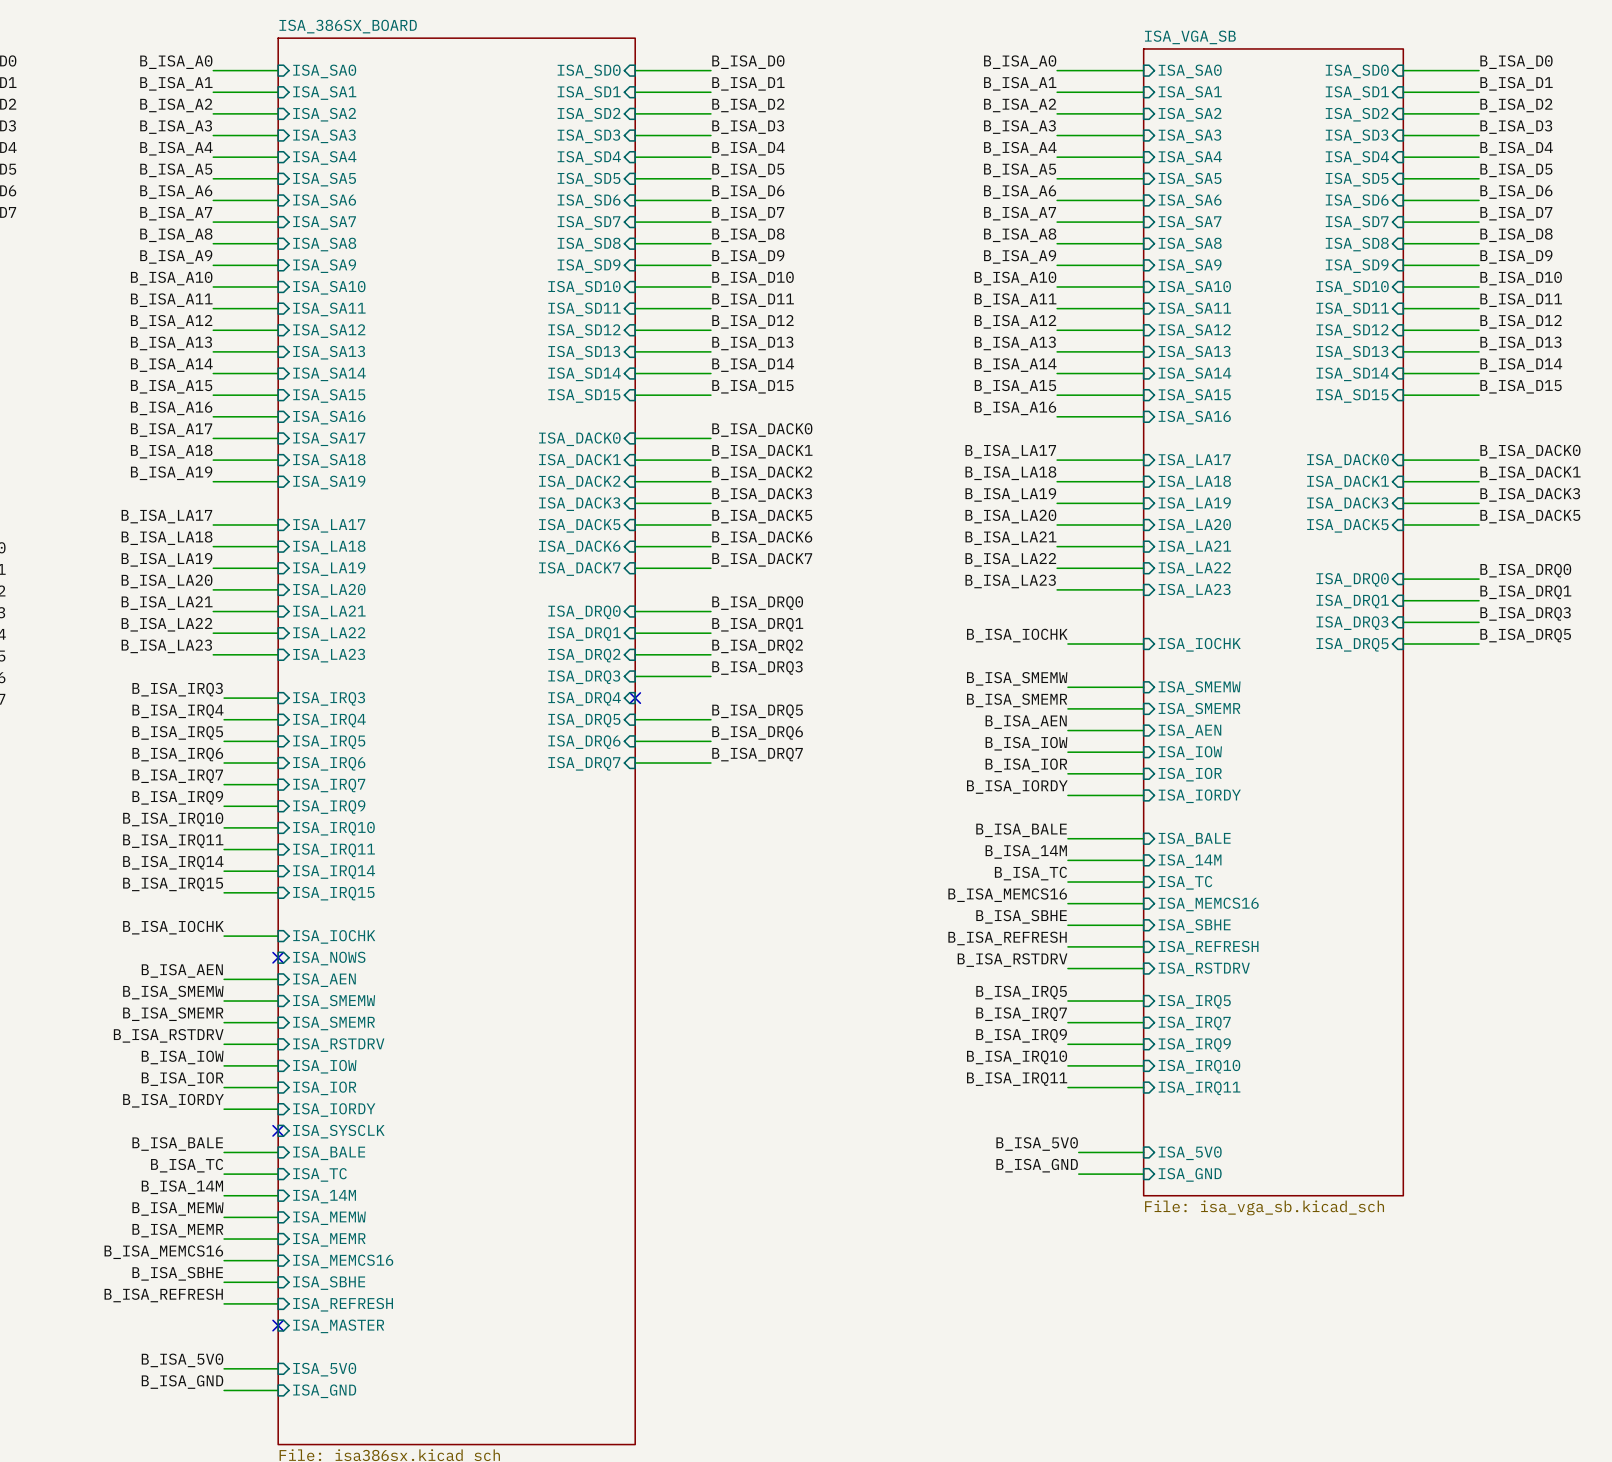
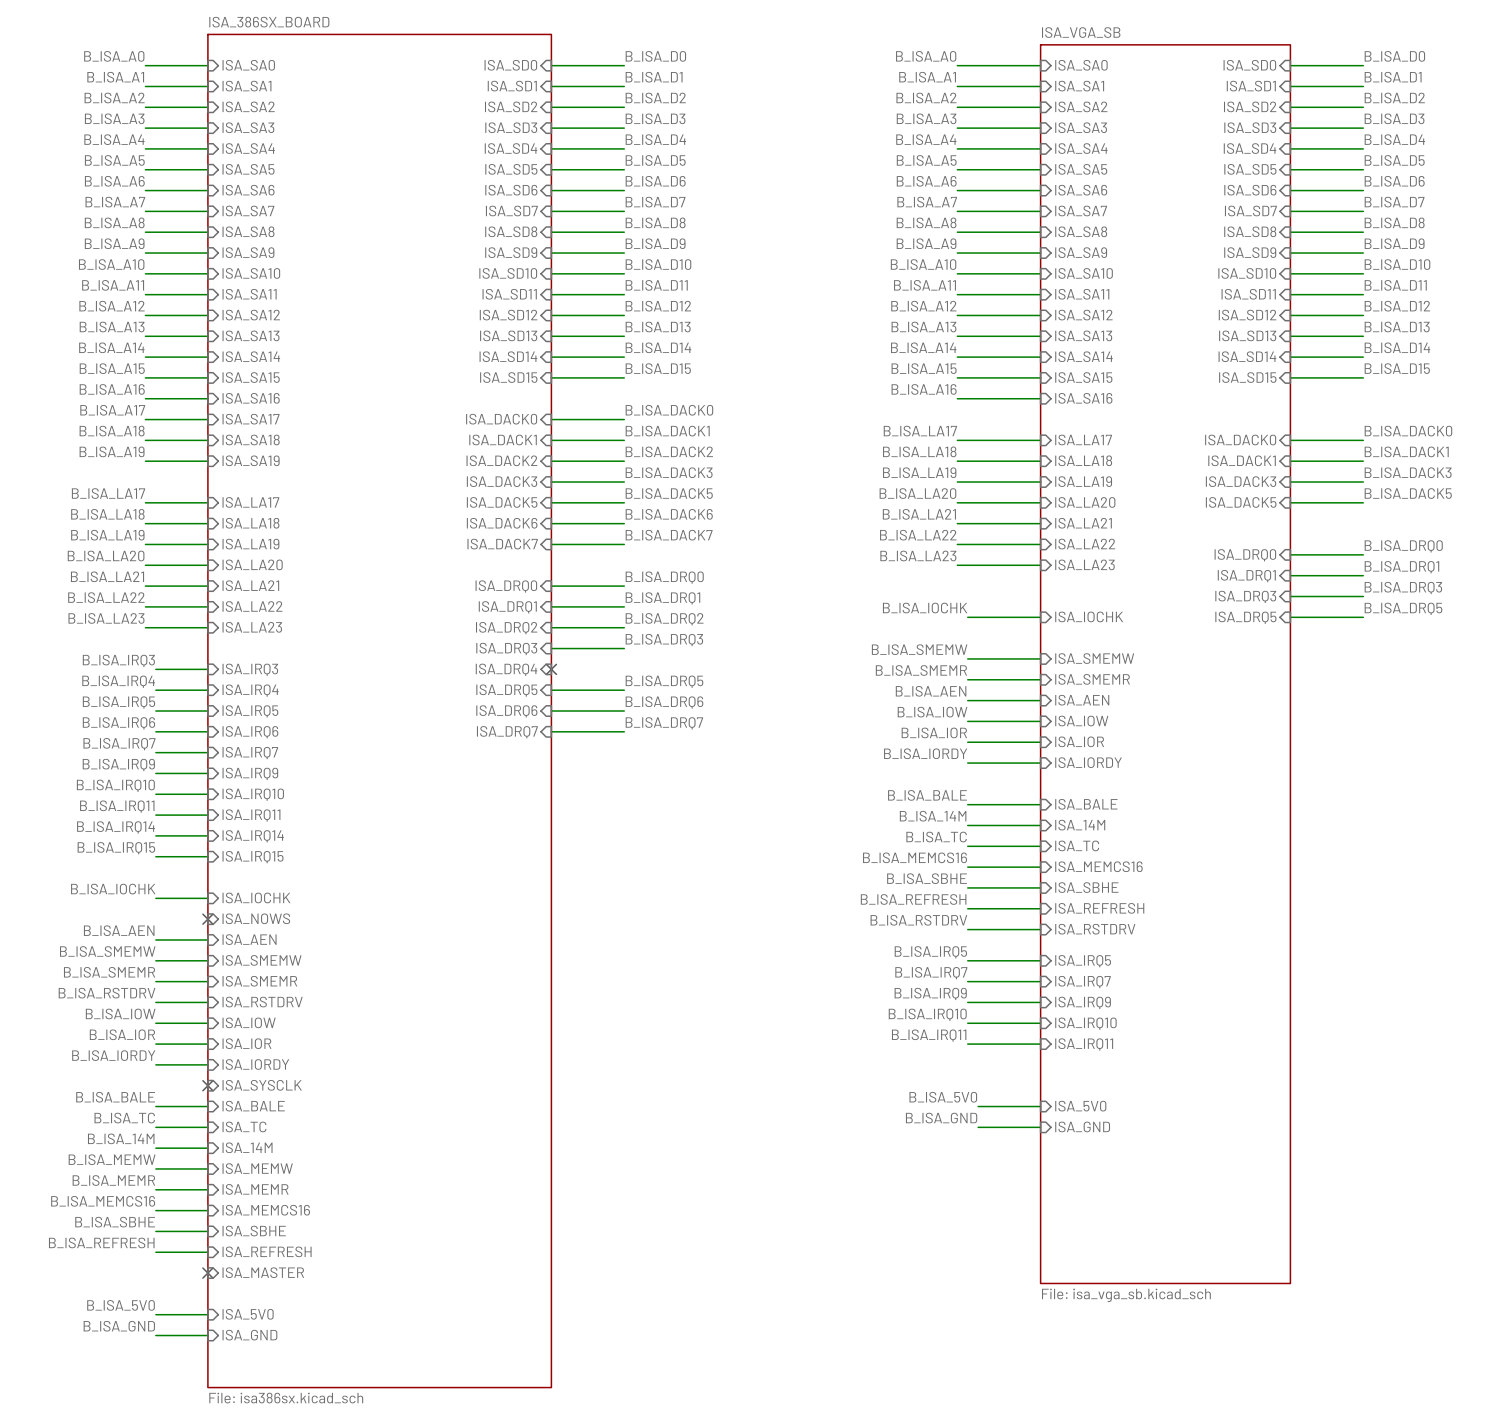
sheet ISA_VGA_SB: File: isa_vga_sb.kicad_sch (1273, 622) -> none
sheet ISA_VGA_SB: none -> File: isa_vga_sb.kicad_sch (1165, 664)

